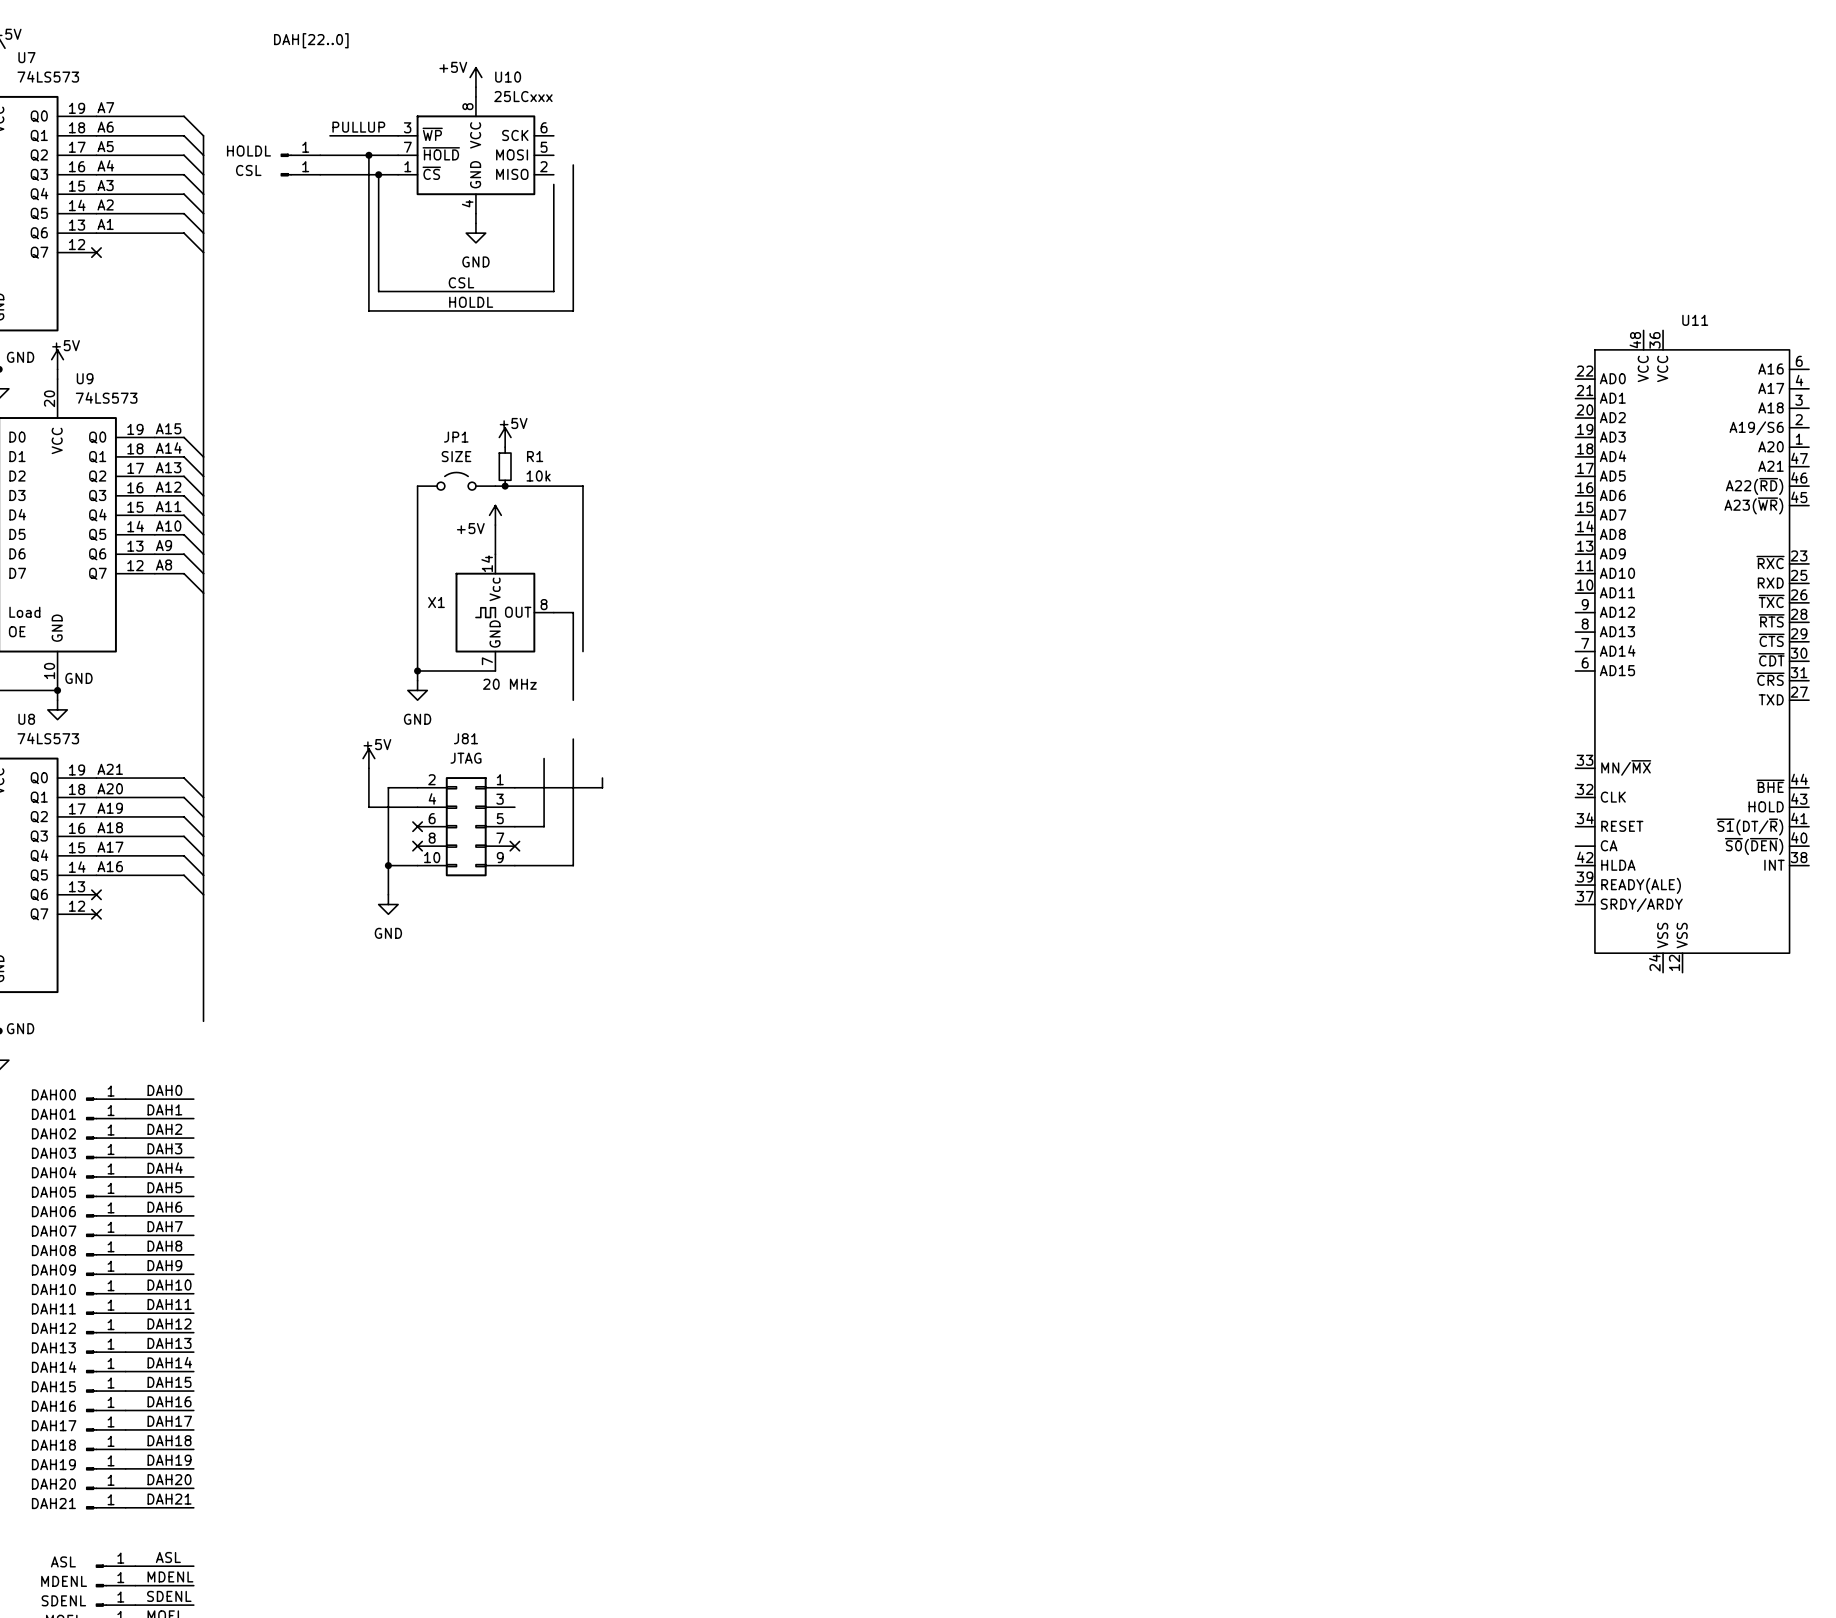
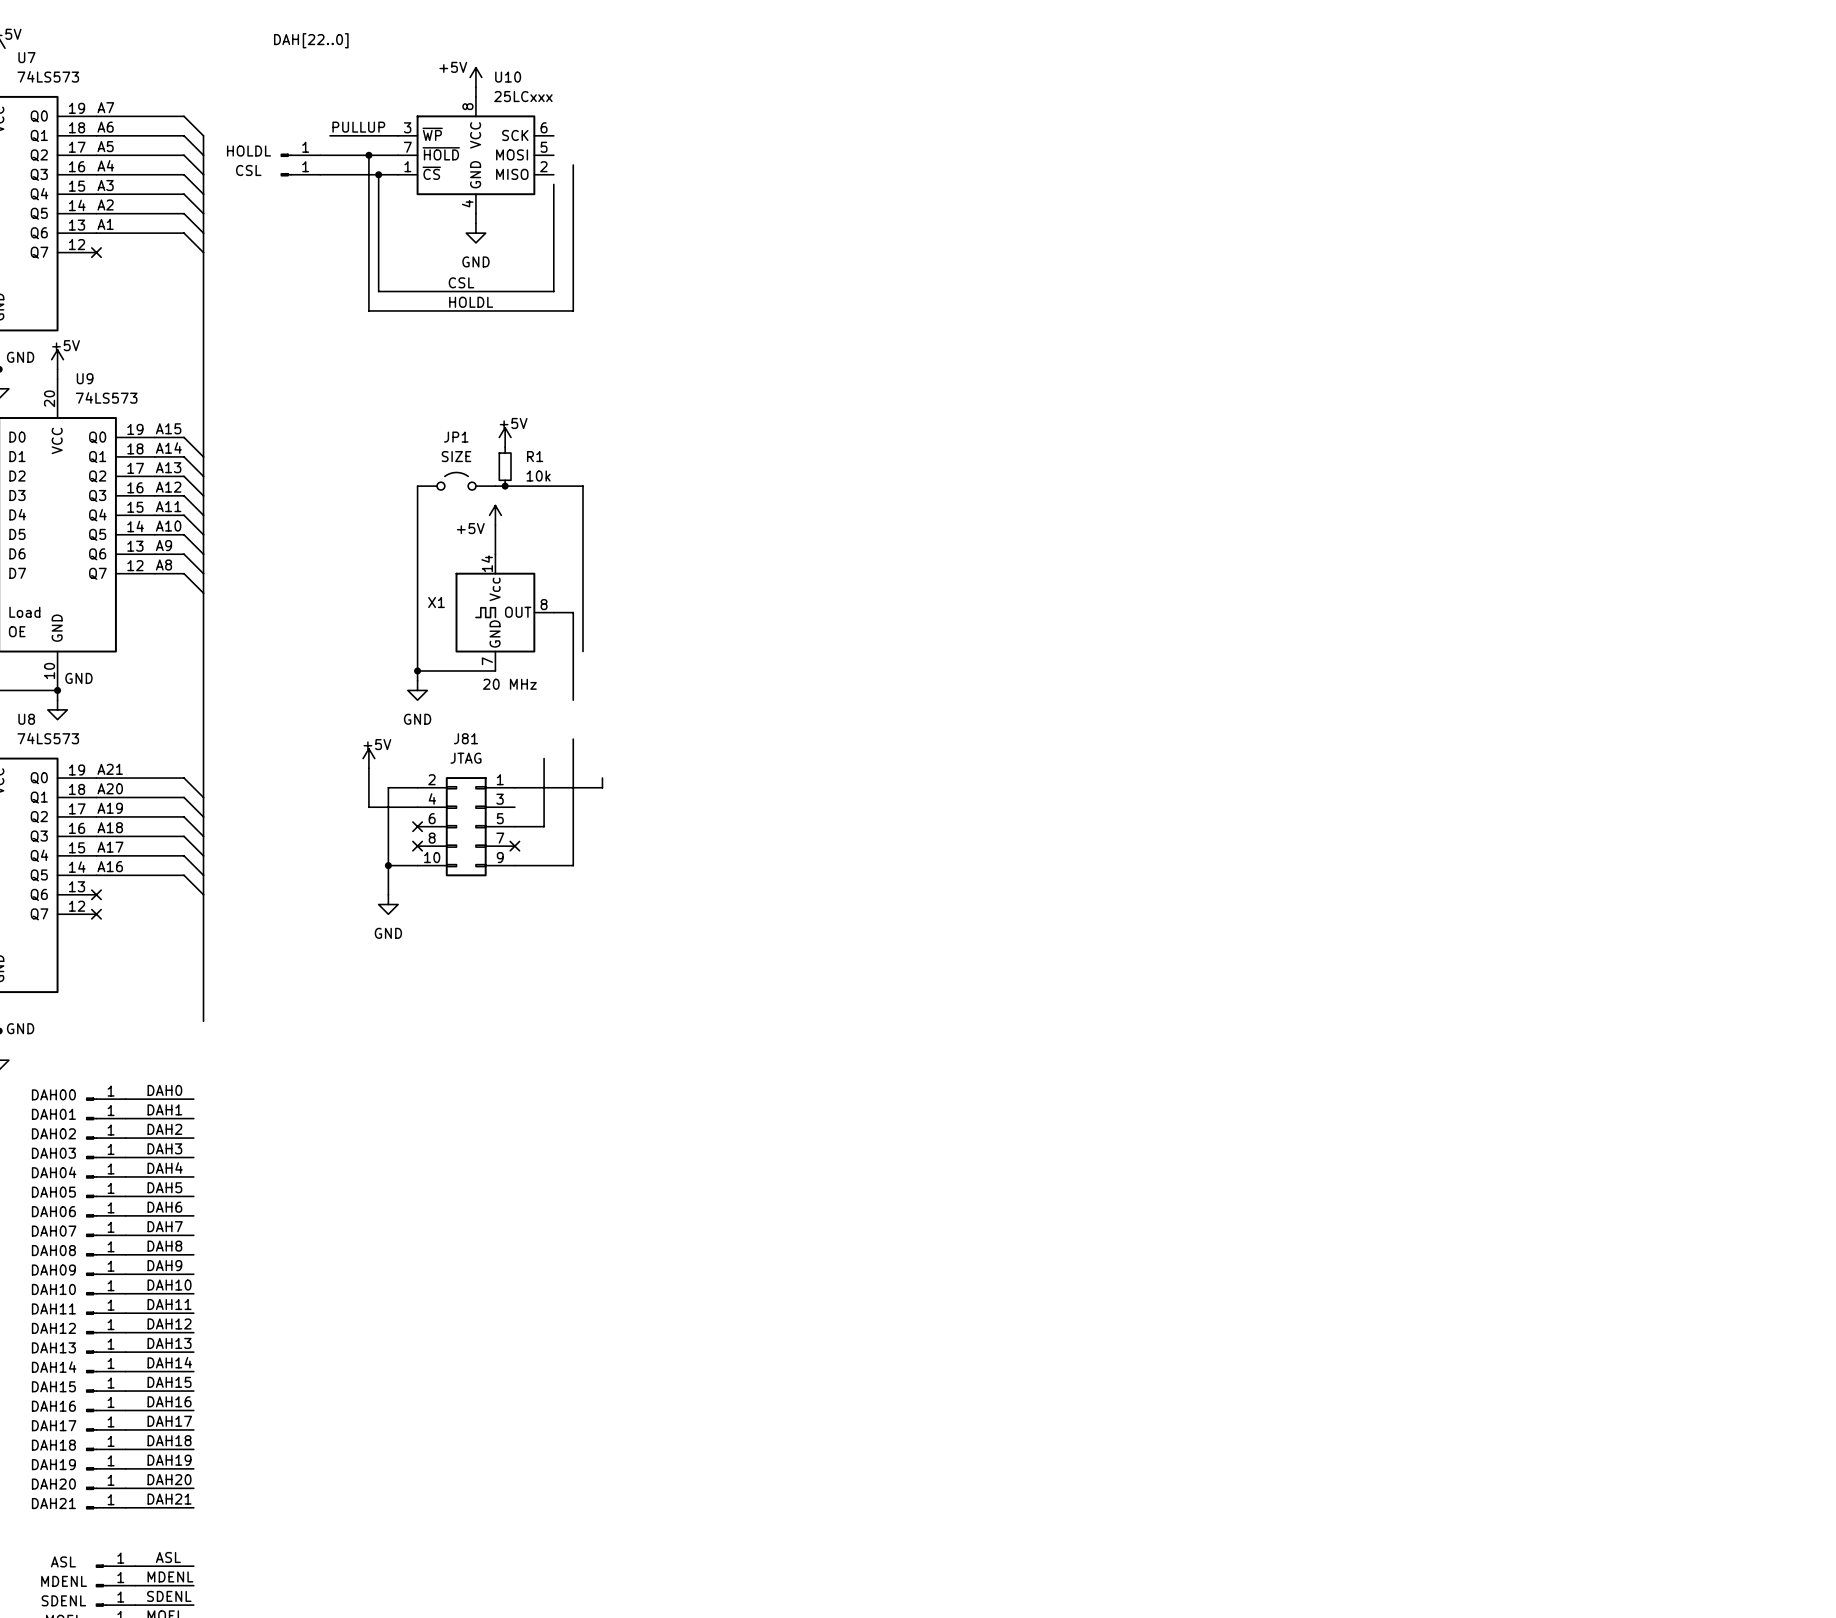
U11: (1692, 651) -> none

